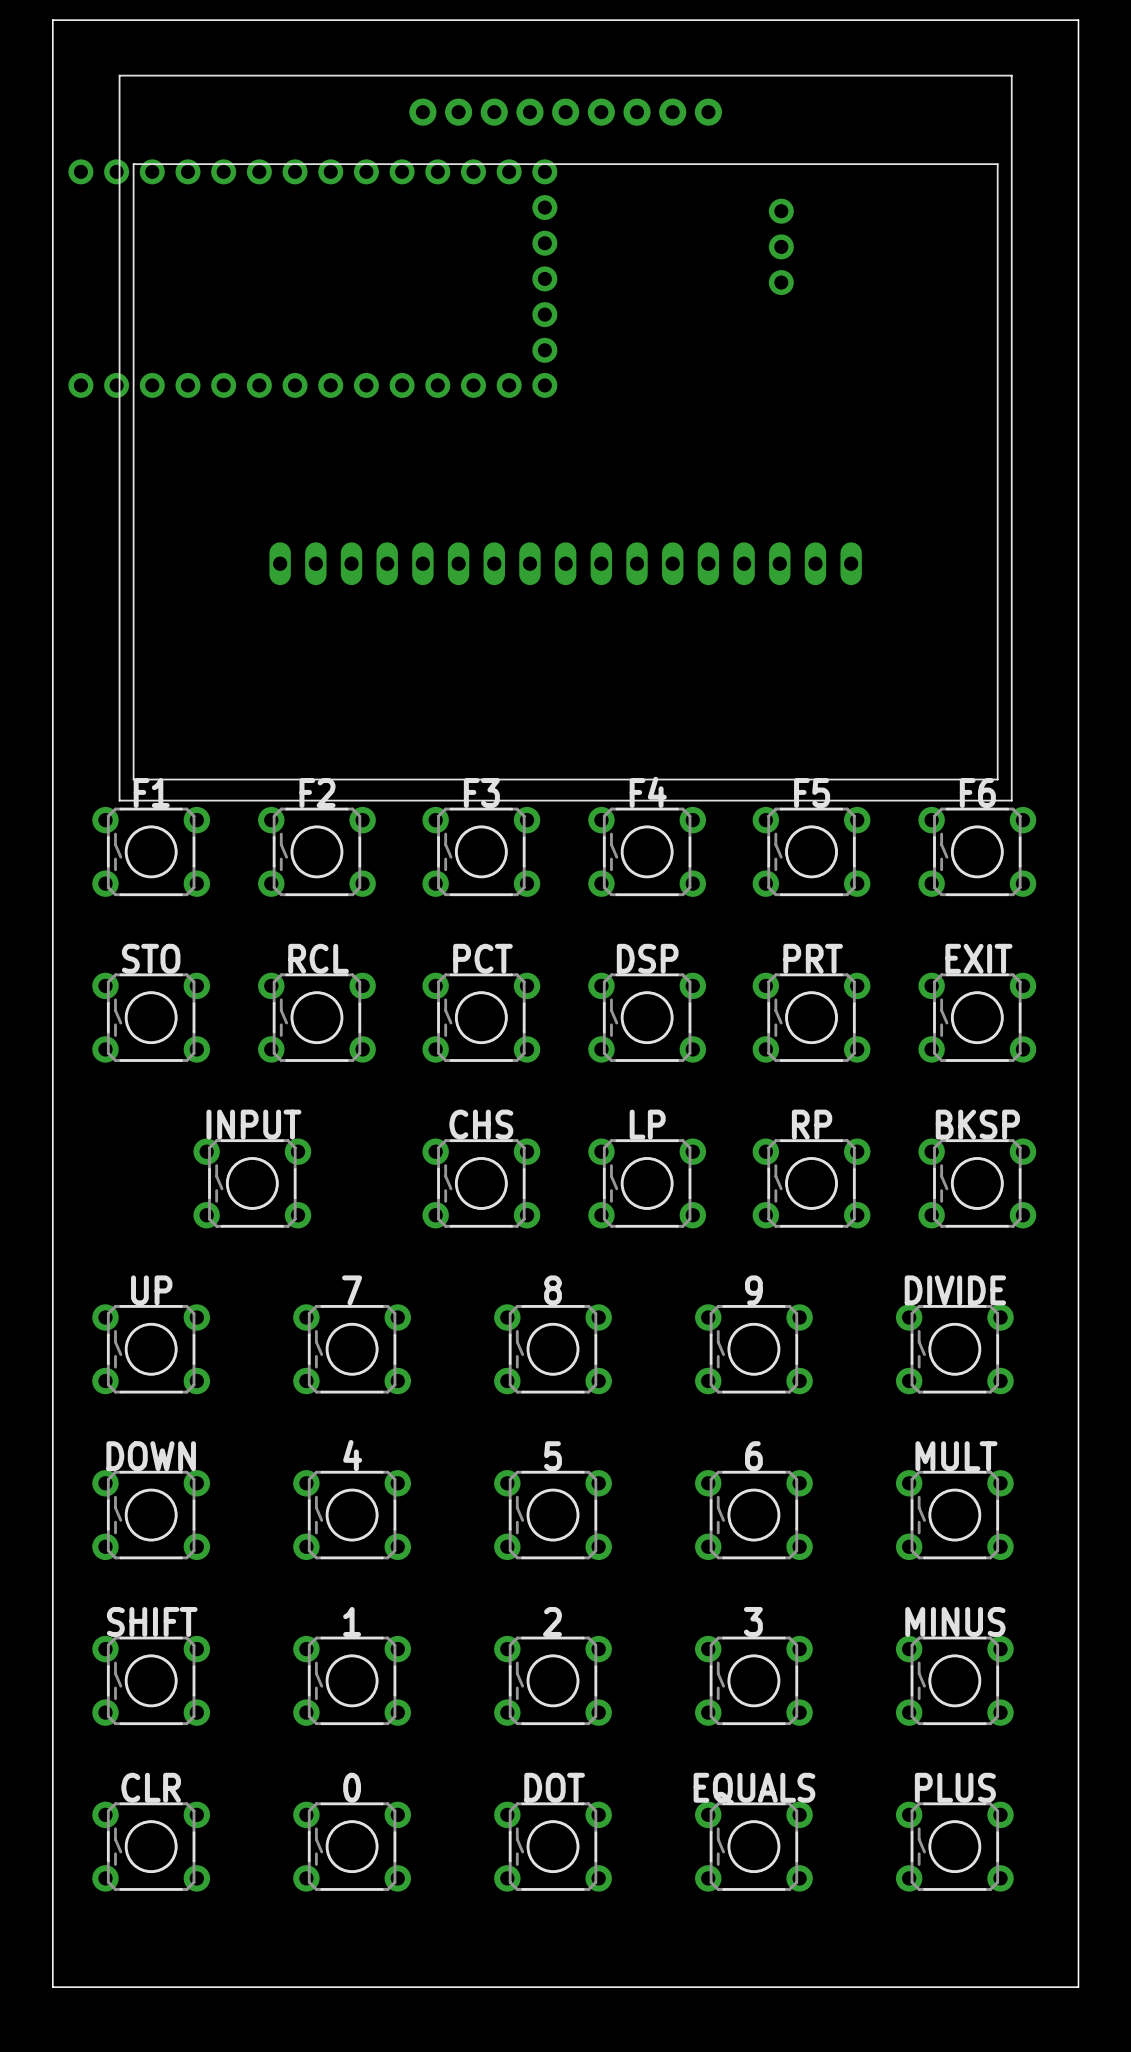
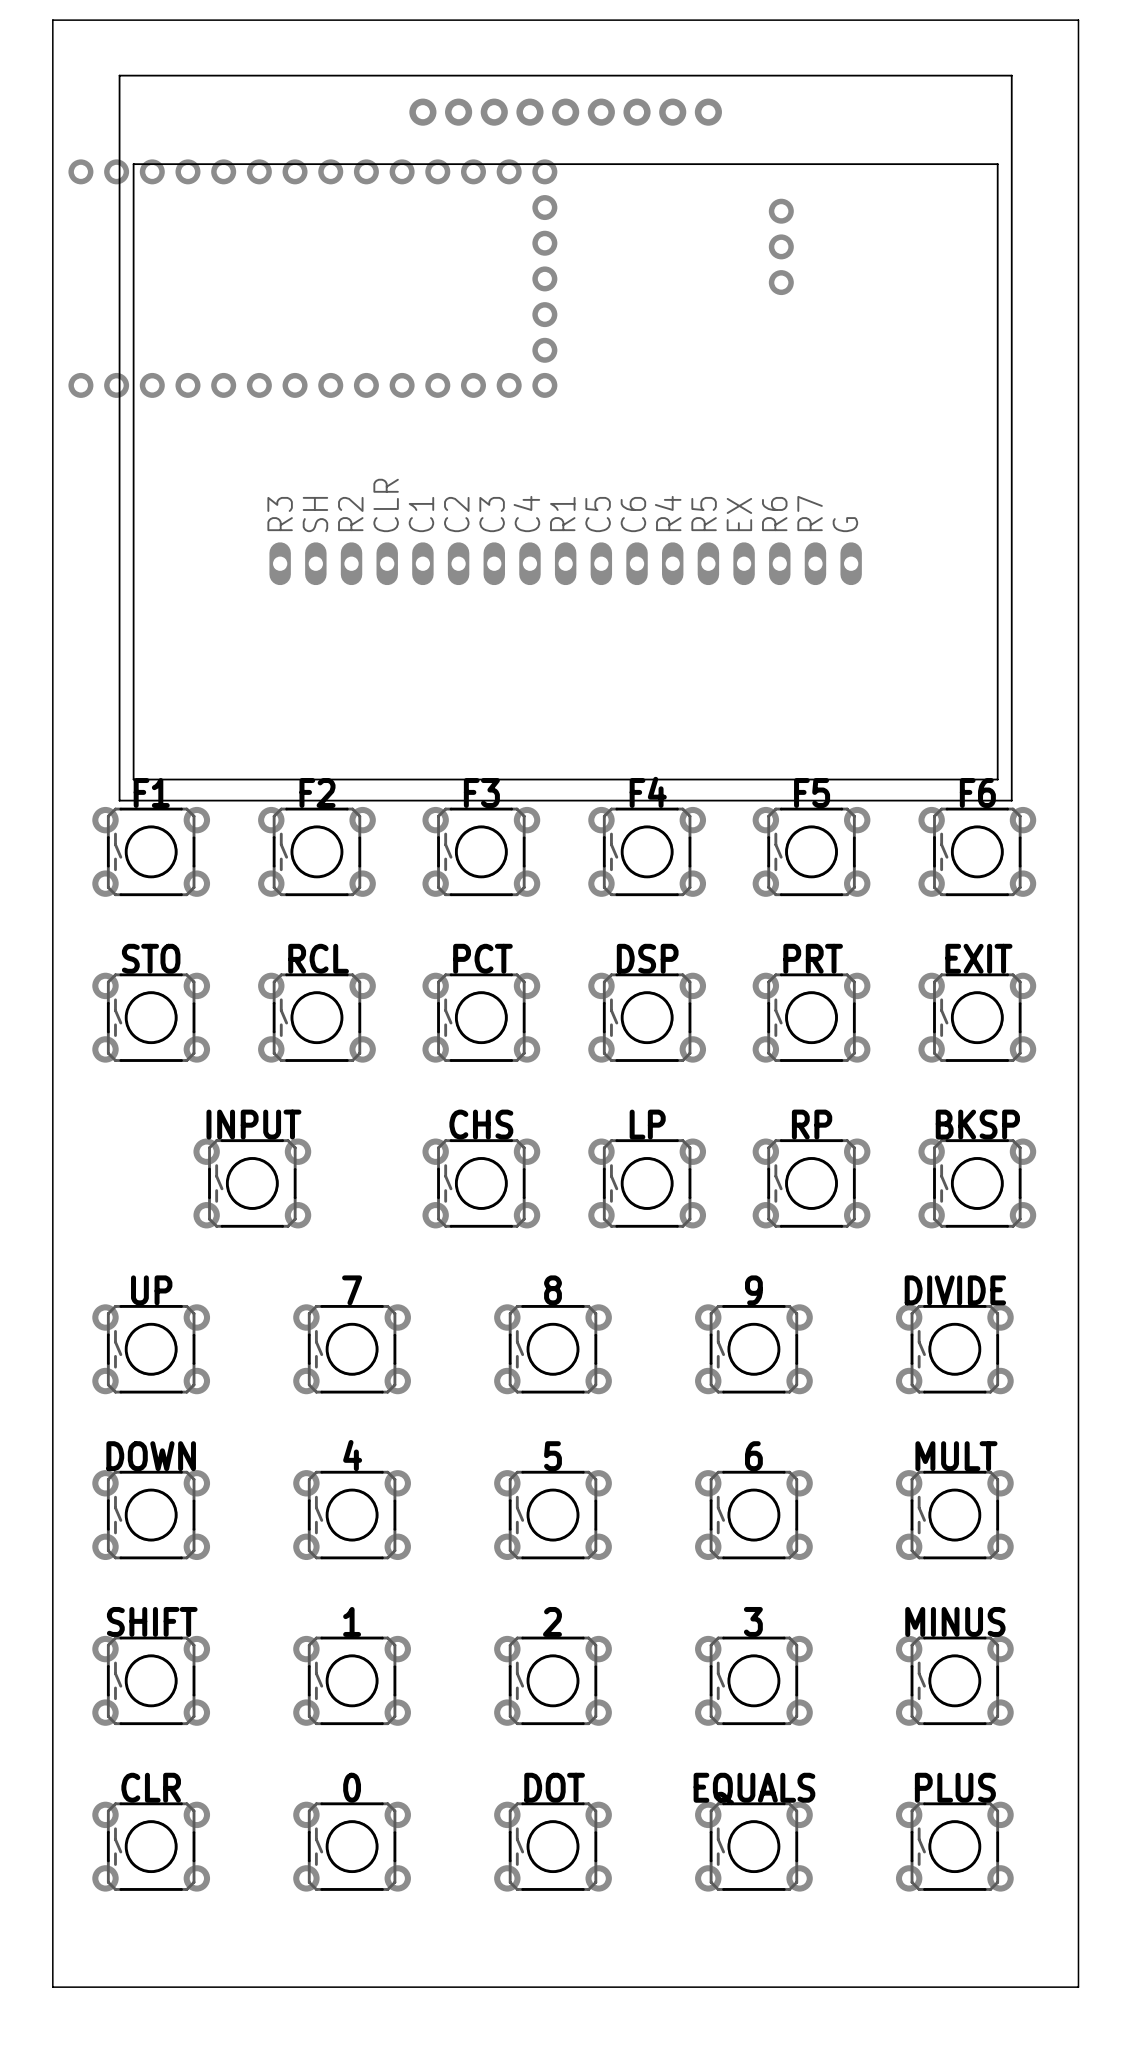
text: none -> CLR (386, 505)
text: none -> R4 (668, 513)
text: none -> R7 (810, 513)
text: none -> R3 (280, 514)
text: none -> SH (315, 514)
text: none -> R2 (350, 514)
text: none -> C1 (421, 514)
text: none -> C2 (456, 514)
text: none -> C3 (492, 514)
text: none -> C4 (526, 514)
text: none -> R1 (562, 514)
text: none -> C5 (598, 514)
text: none -> C6 (633, 514)
text: none -> R5 (704, 514)
text: none -> EX (739, 514)
text: none -> R6 (774, 514)
text: none -> G (845, 524)

